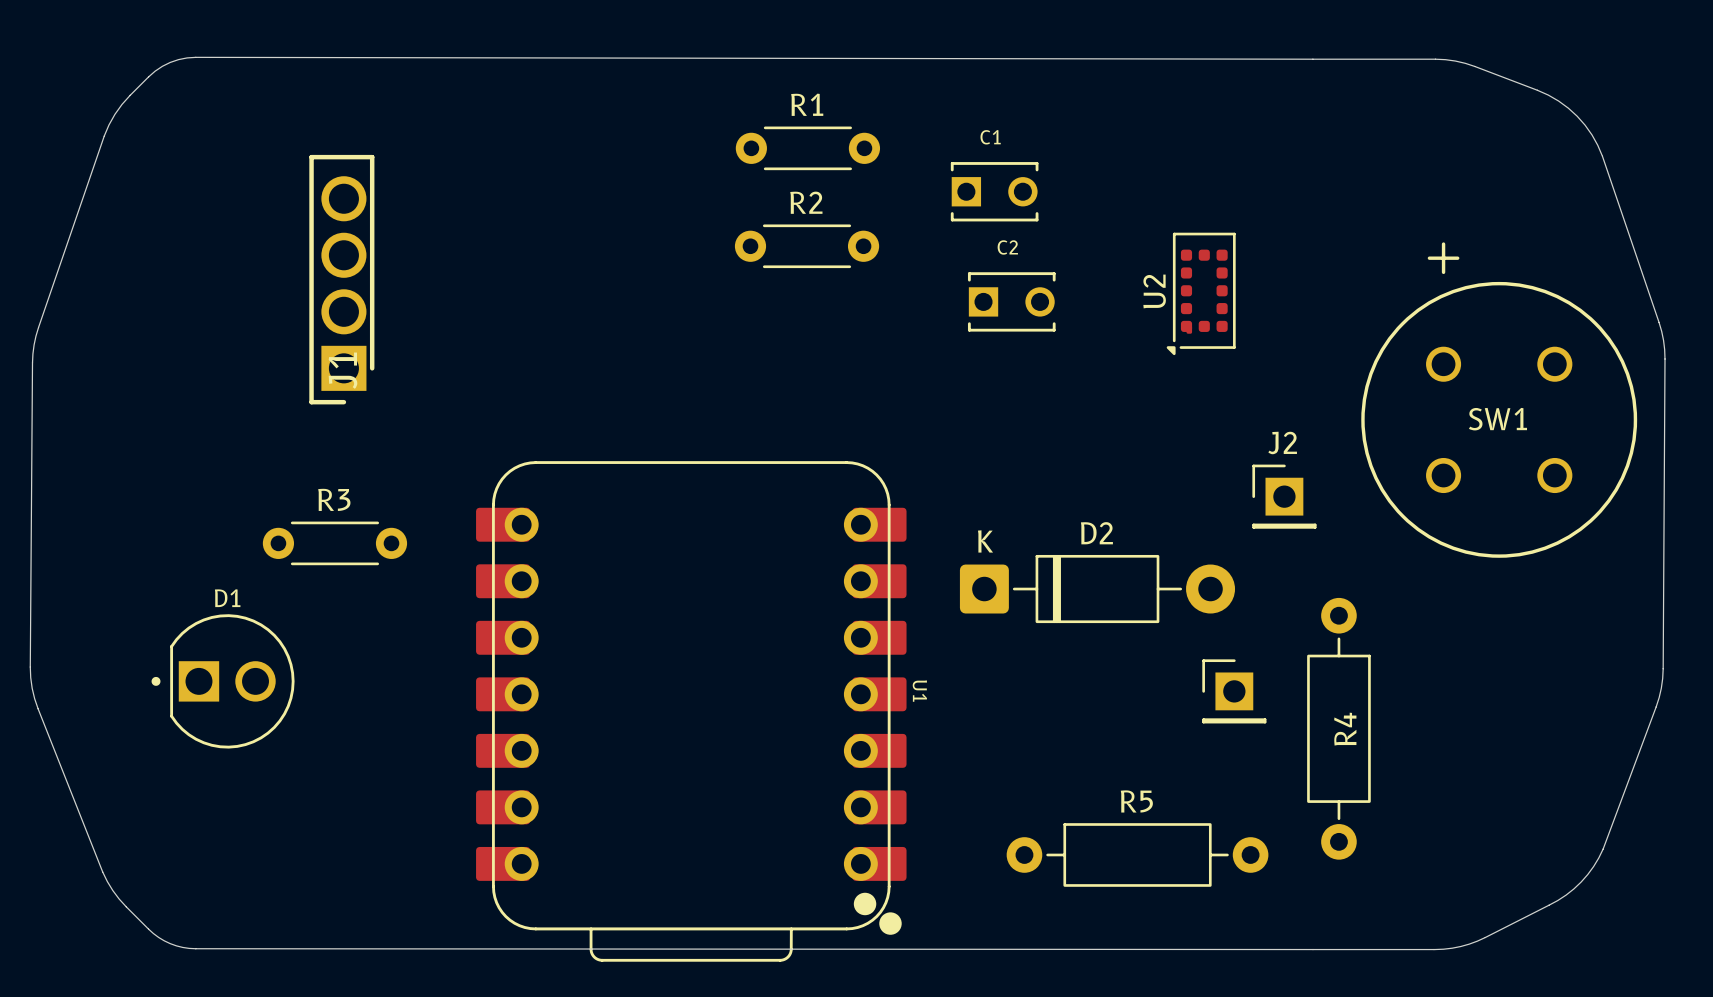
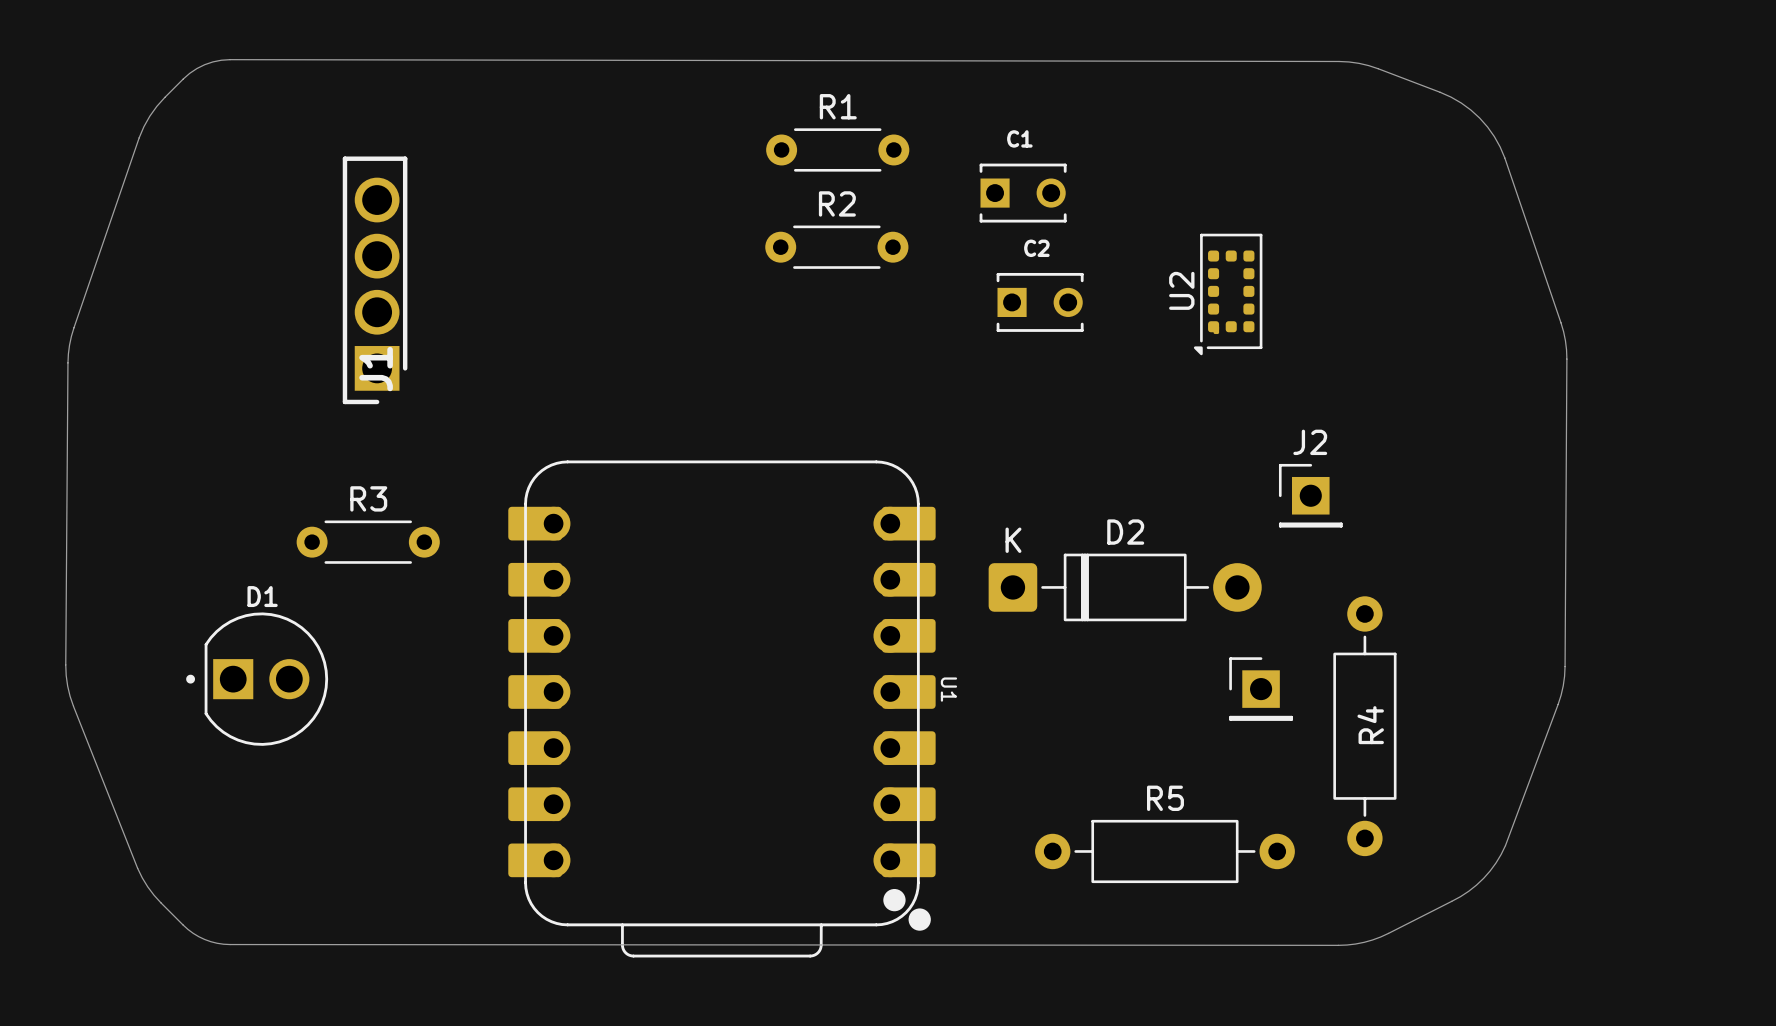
board edge: (1312, 59) (1435, 59) (1455, 61) (1537, 90) (1568, 108) (1585, 125) (1602, 156) (1659, 322) (1663, 340) (1665, 359) (1662, 678) (1656, 706) (1598, 857) (1587, 874) (1566, 895) (1469, 944) (1434, 949) (1312, 949) -> (1339, 61) (1368, 65) (1440, 92) (1461, 103) (1487, 126) (1504, 157) (1560, 322) (1565, 340) (1566, 359) (1564, 676) (1558, 704) (1505, 845) (1490, 870) (1476, 885) (1460, 896) (1380, 937) (1364, 942) (1338, 945)
SW1: (1499, 400) -> none

